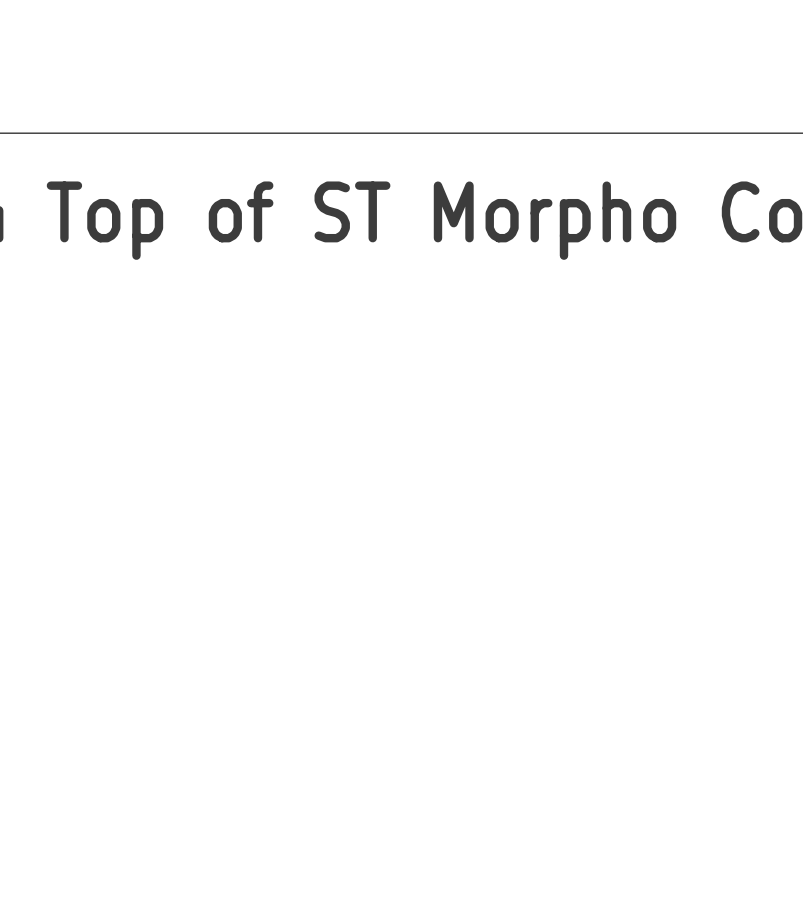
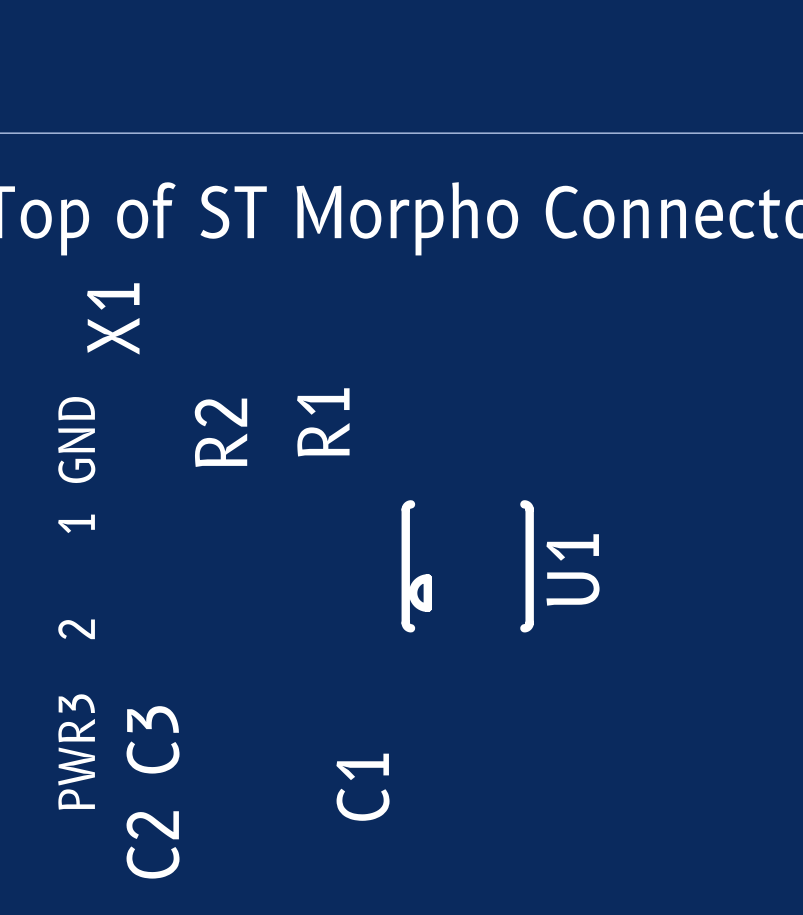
text: none -> X1 (113, 318)
text: none -> R1 (323, 422)
text: none -> R2 (220, 432)
text: none -> GND (76, 440)
line: none -> (411, 504) (405, 509) (405, 623) (411, 628)
line: none -> (524, 504) (529, 509) (529, 623) (524, 628)
text: none -> 1 (76, 523)
line: none -> (427, 578) (427, 607) (417, 603) (413, 593) (417, 582) (427, 578)
text: none -> U1 (573, 569)
text: none -> 2 (76, 629)
text: none -> C3 (153, 739)
text: none -> PWR3 (76, 752)
text: none -> C1 (362, 787)
text: none -> C2 (153, 844)

